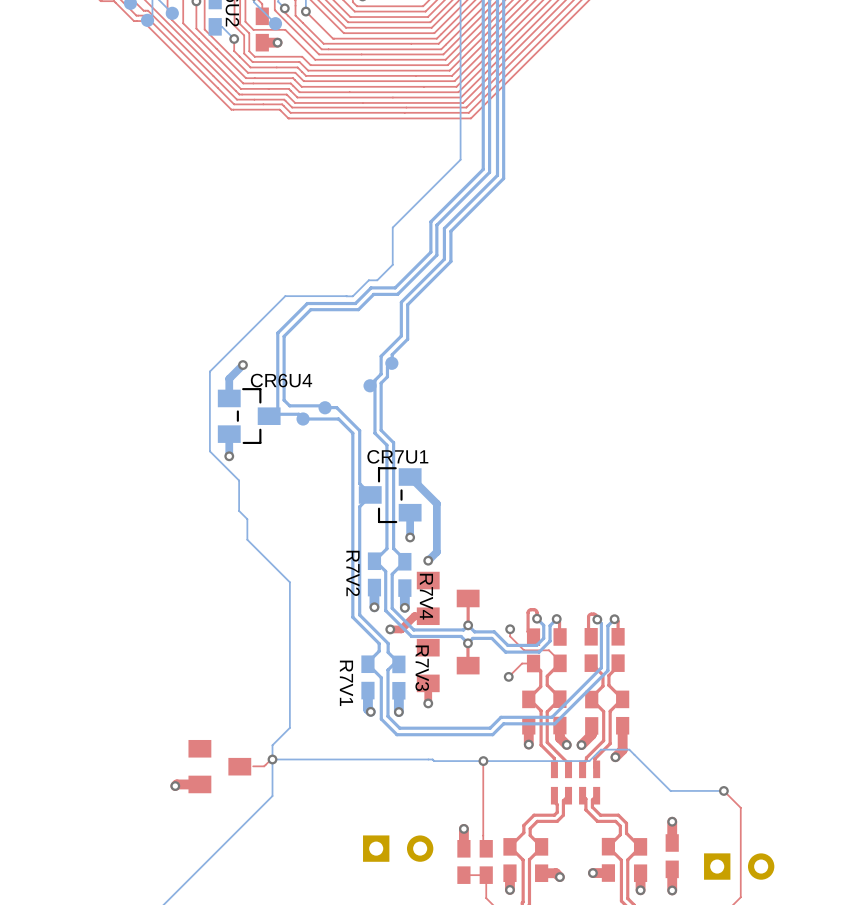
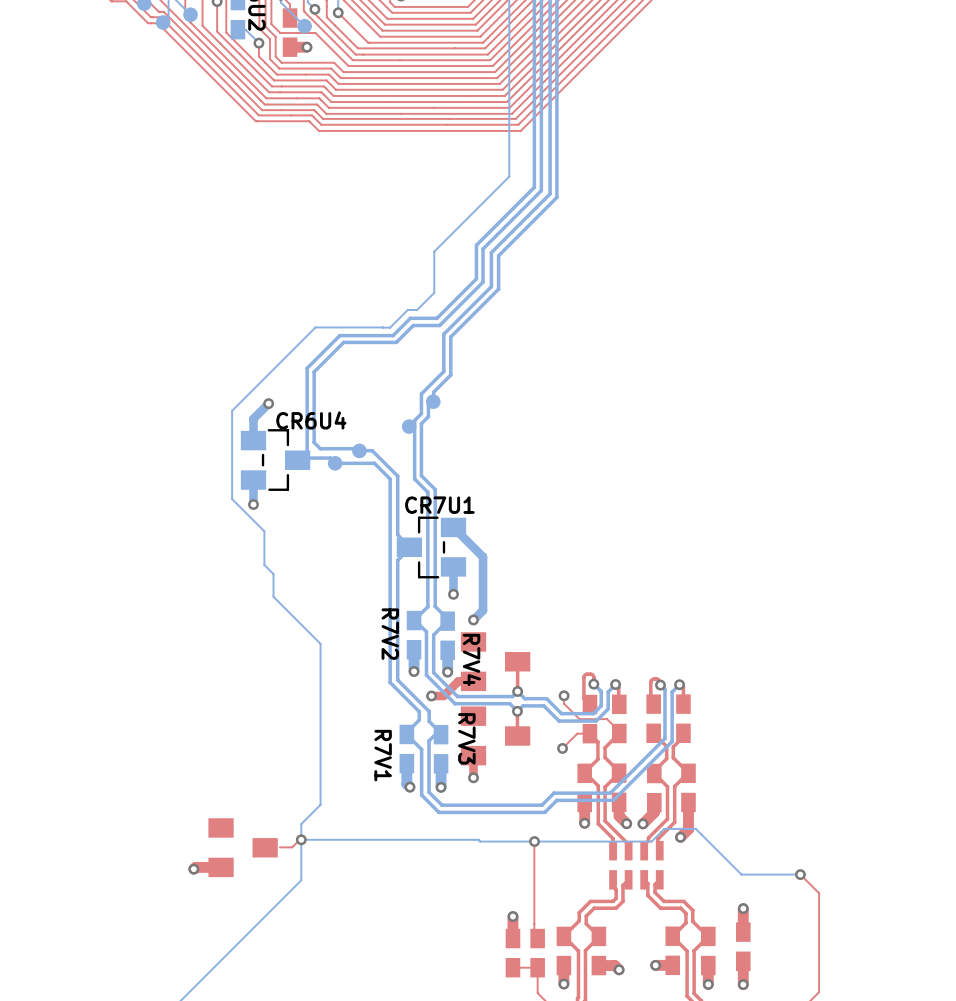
part: (398, 848) -> none
part: (739, 866) -> none

